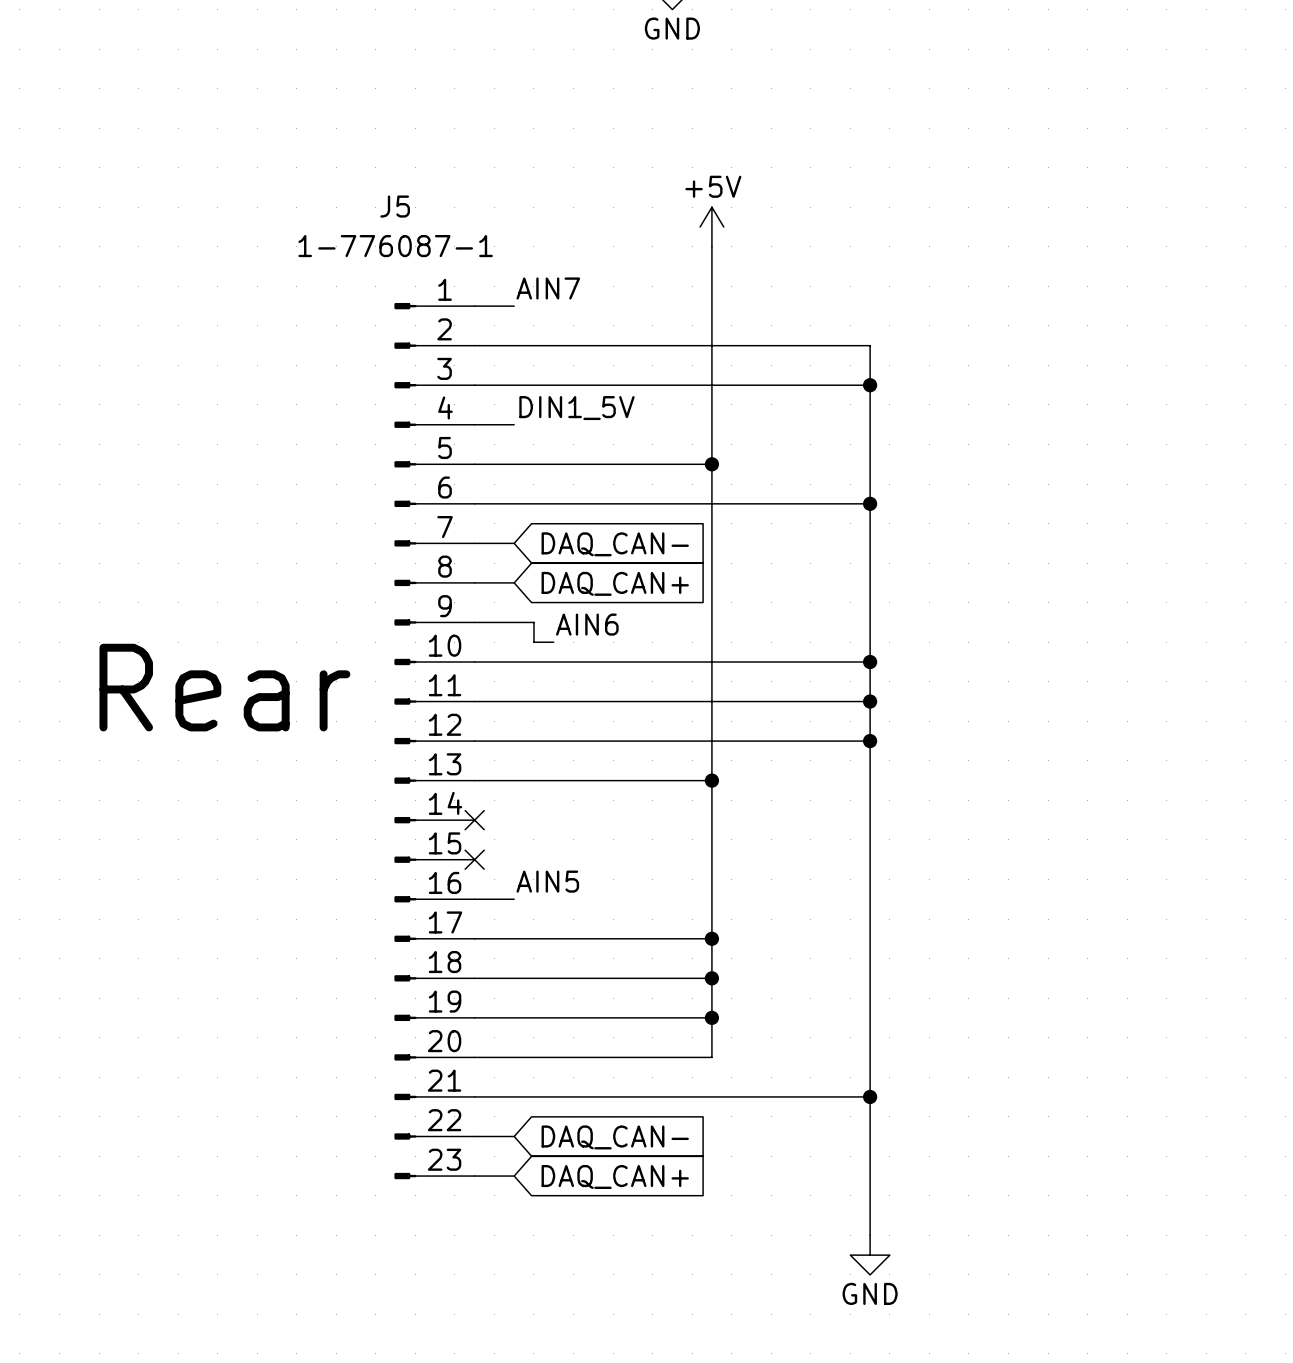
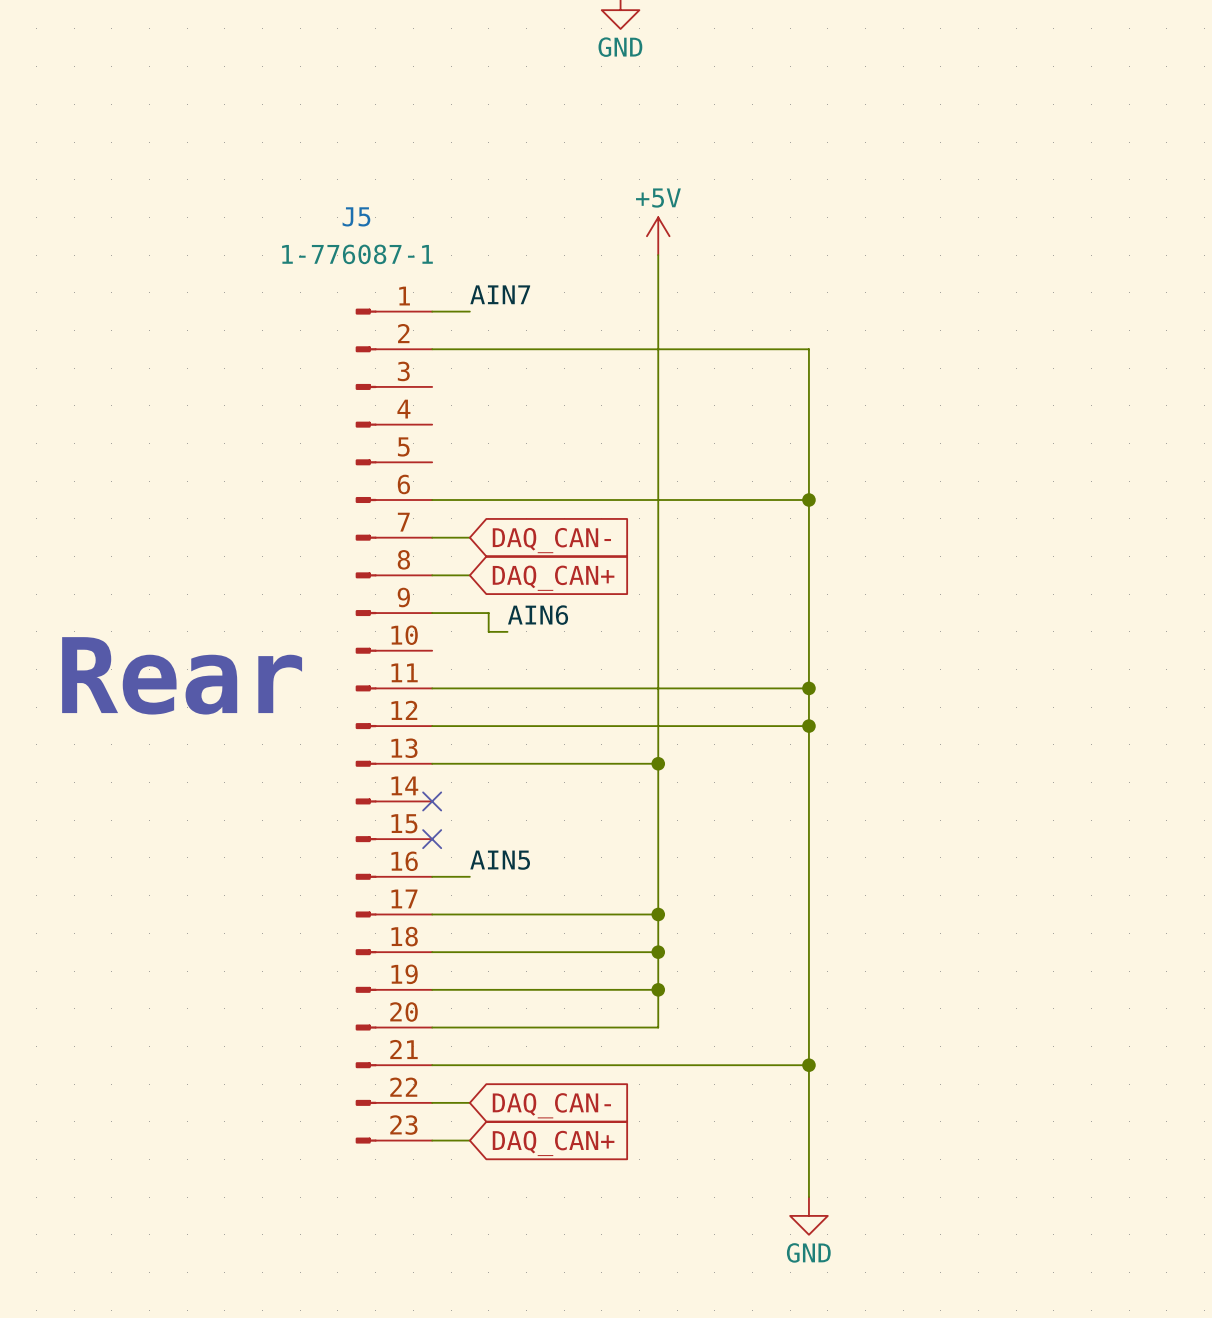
wire: (474, 385) (870, 385) -> none
junction: (870, 385) -> none
label: DIN1_5V (576, 408) -> none
wire: (474, 424) (514, 424) -> none
wire: (474, 464) (711, 464) -> none
junction: (711, 464) -> none
wire: (474, 662) (870, 662) -> none
junction: (870, 662) -> none

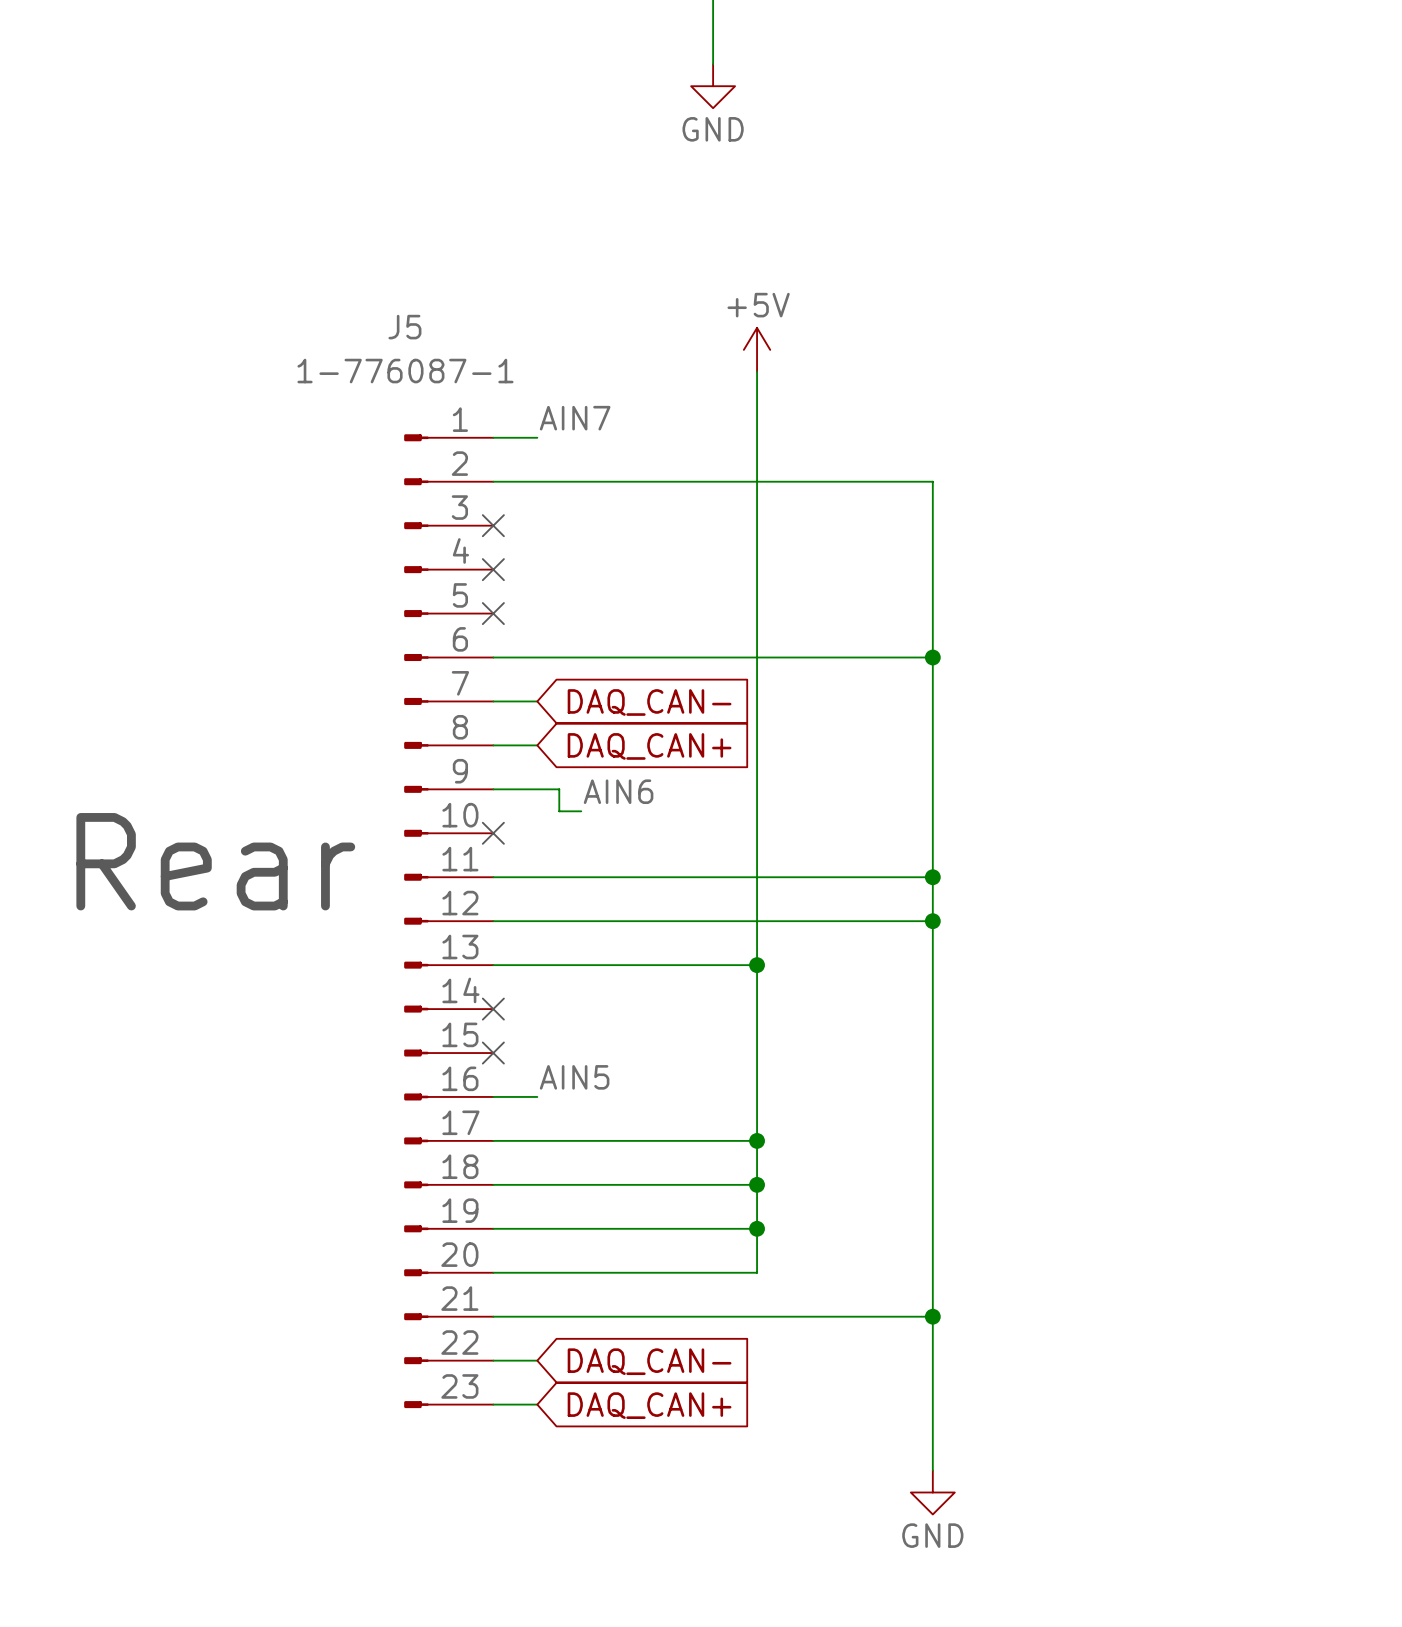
no-connect mark: none -> (493, 525)
no-connect mark: none -> (493, 569)
no-connect mark: none -> (493, 613)
no-connect mark: none -> (493, 833)

